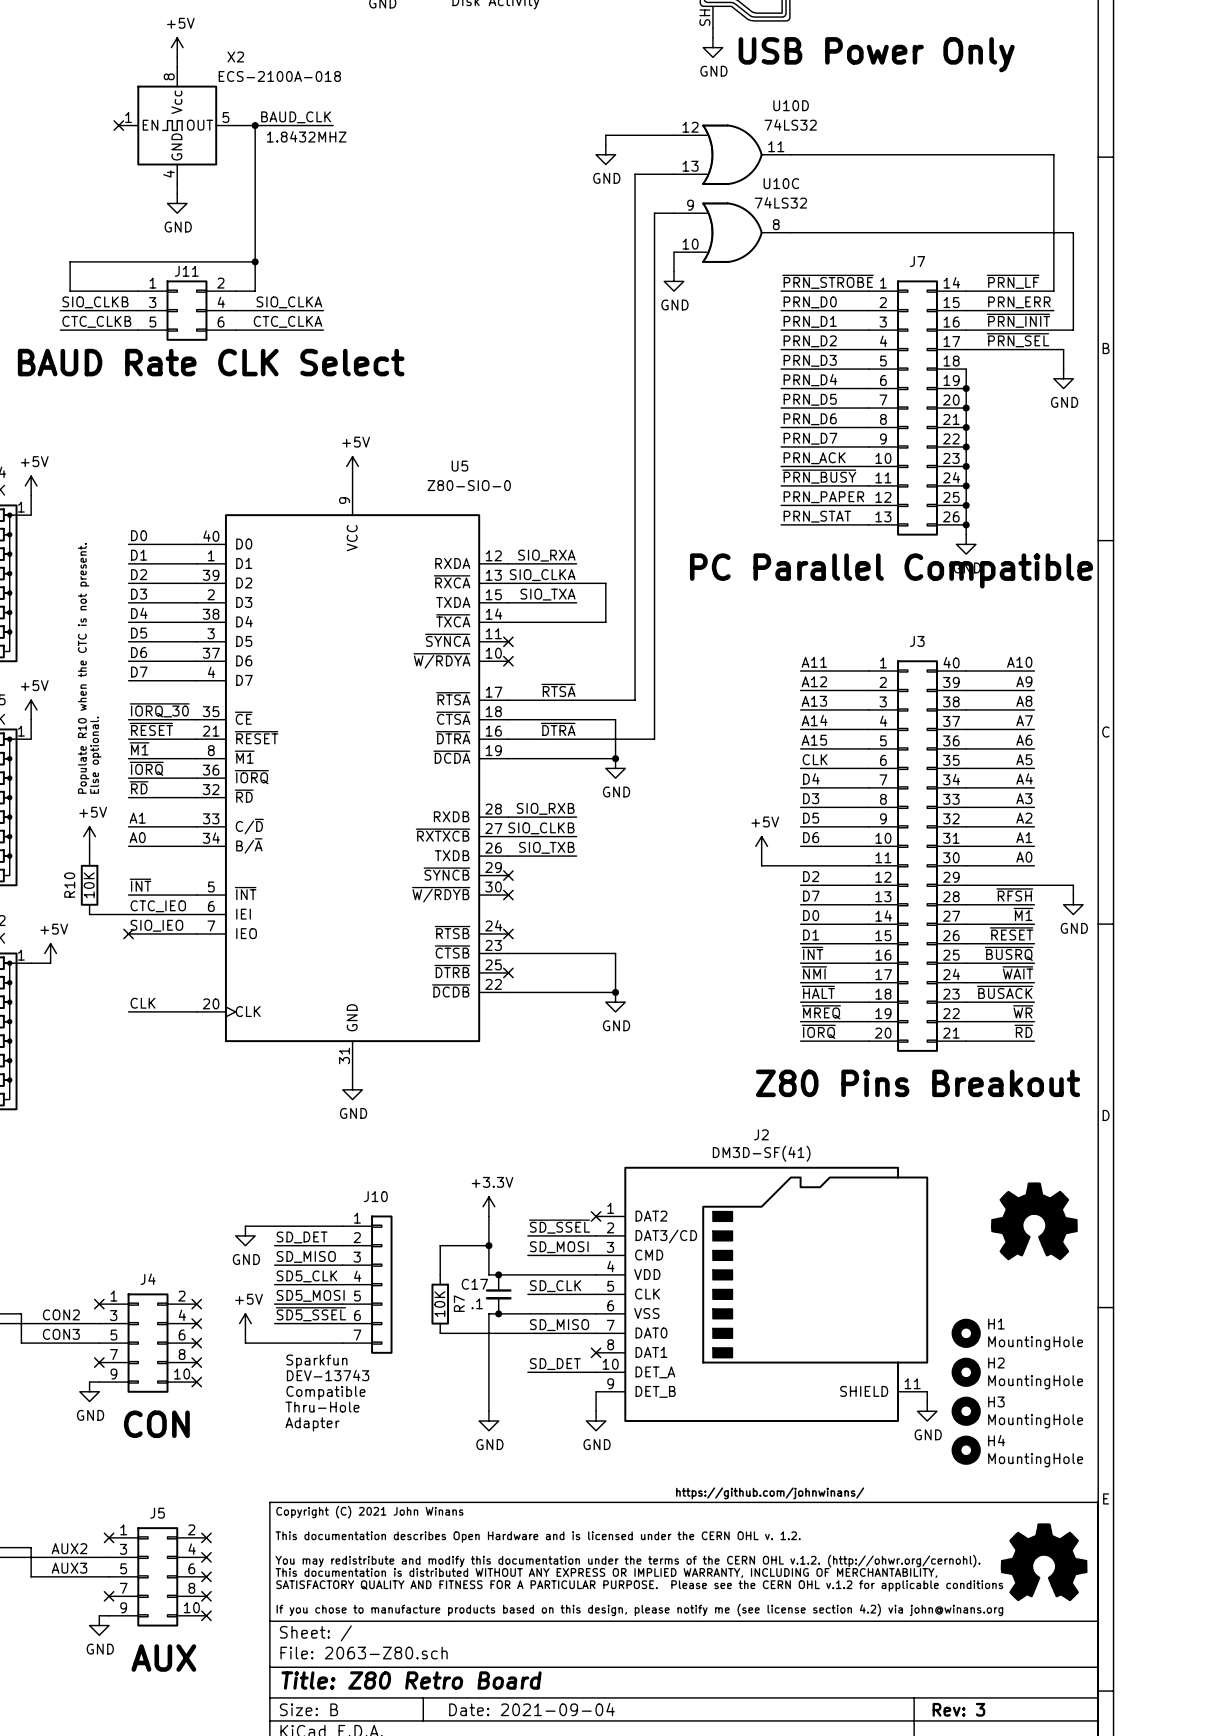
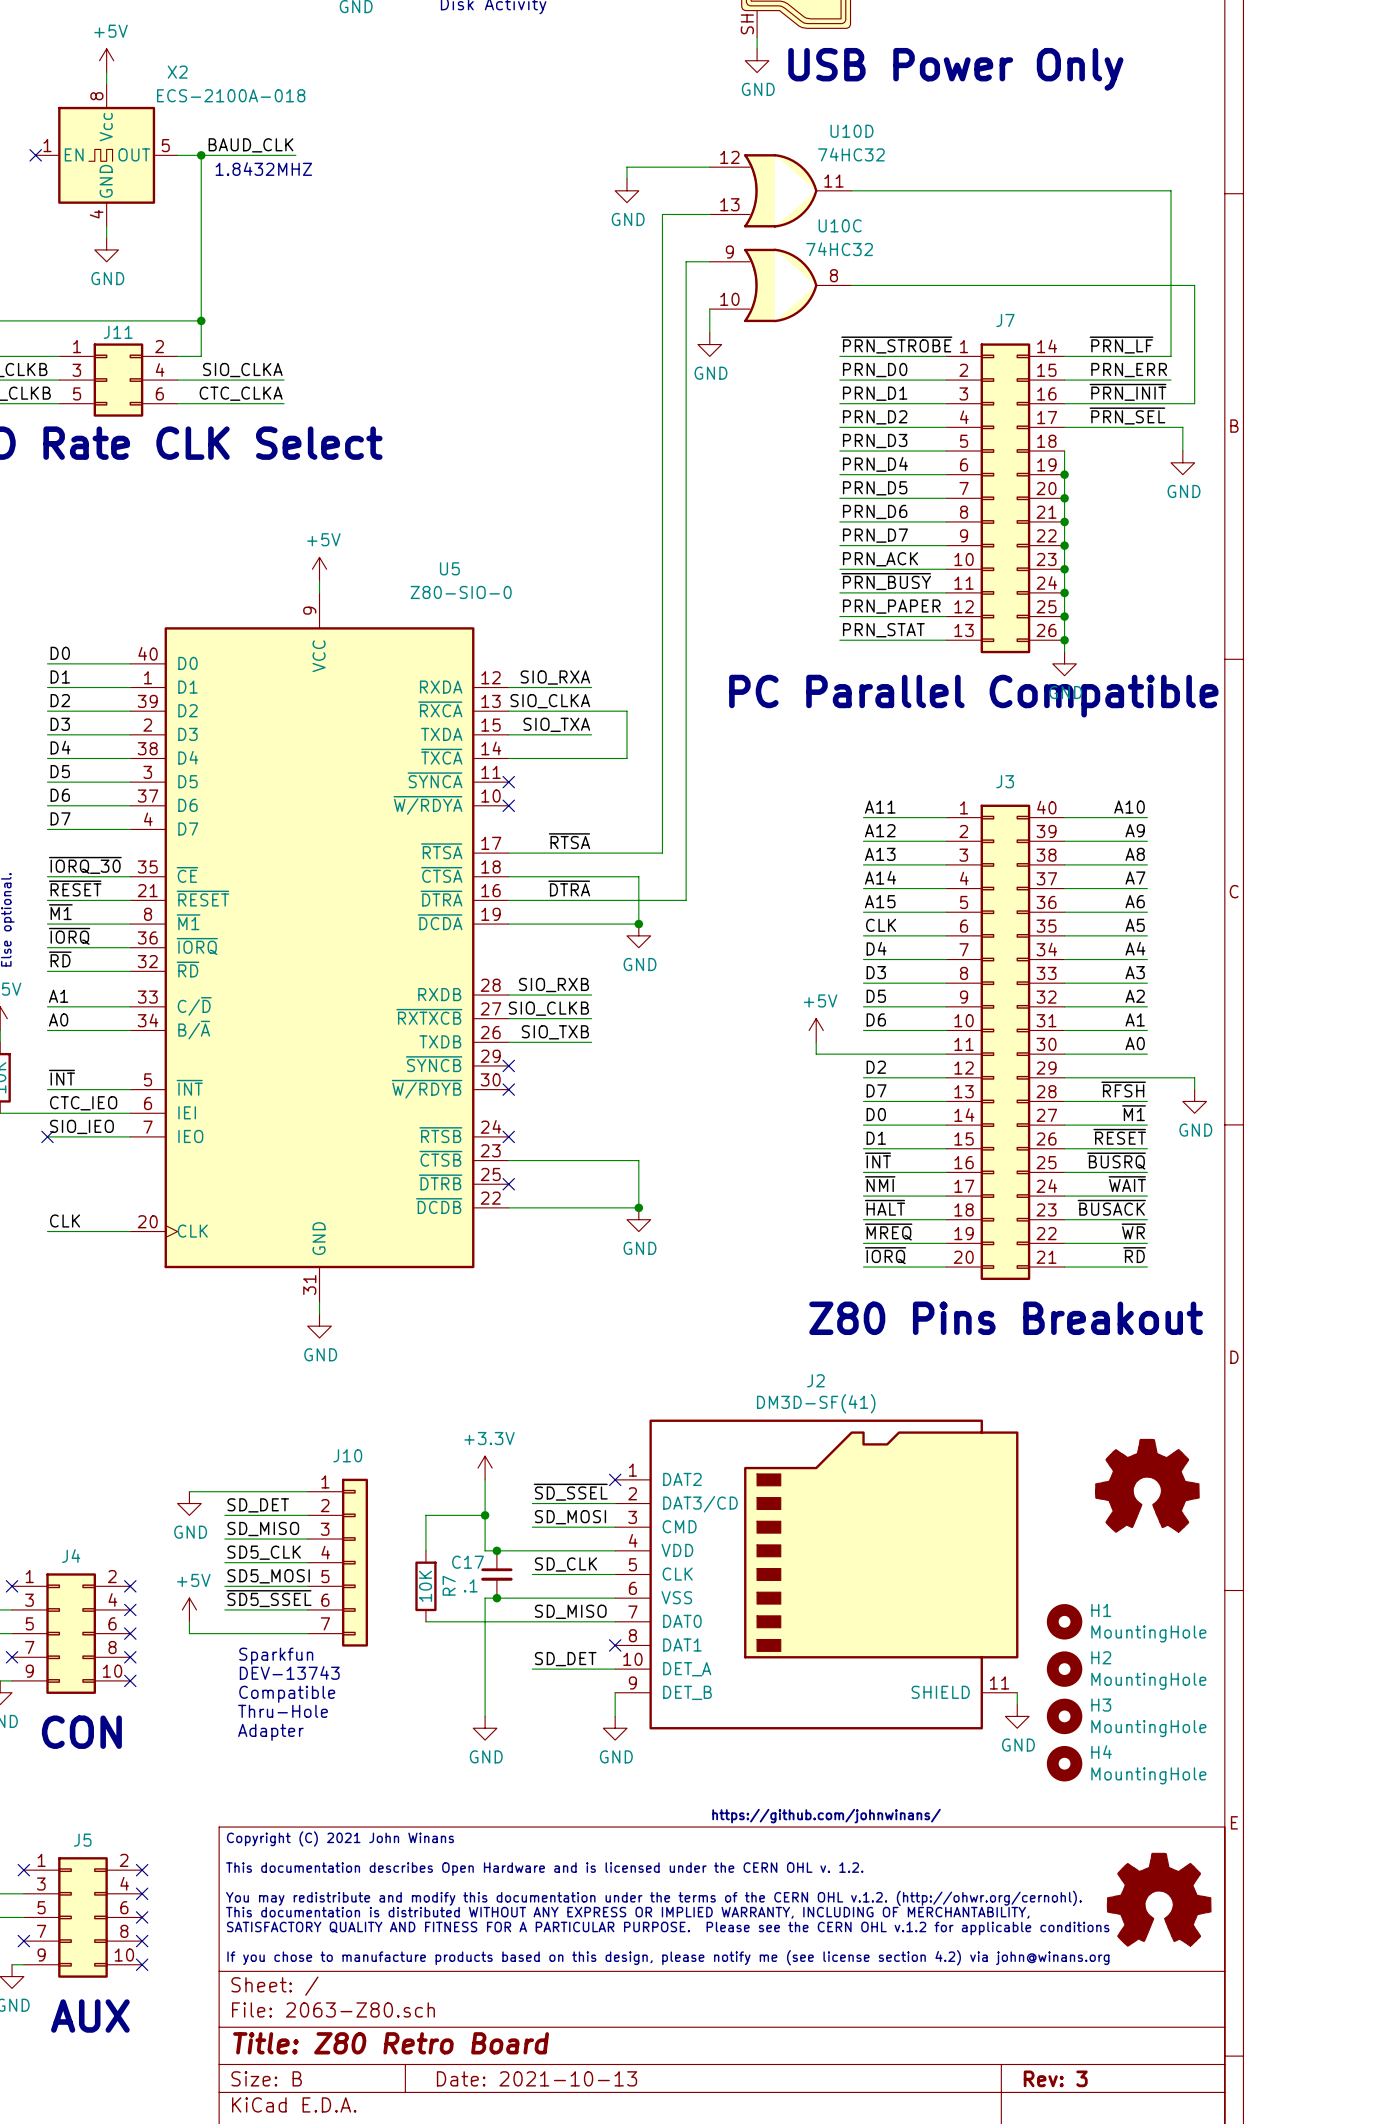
U10D value: 74LS32 (790, 124) -> 74HC32 (851, 154)
U10C value: 74LS32 (780, 202) -> 74HC32 (839, 249)
title block: Date: 2021-09-04 (531, 1709) -> Date: 2021-10-13 (537, 2078)

